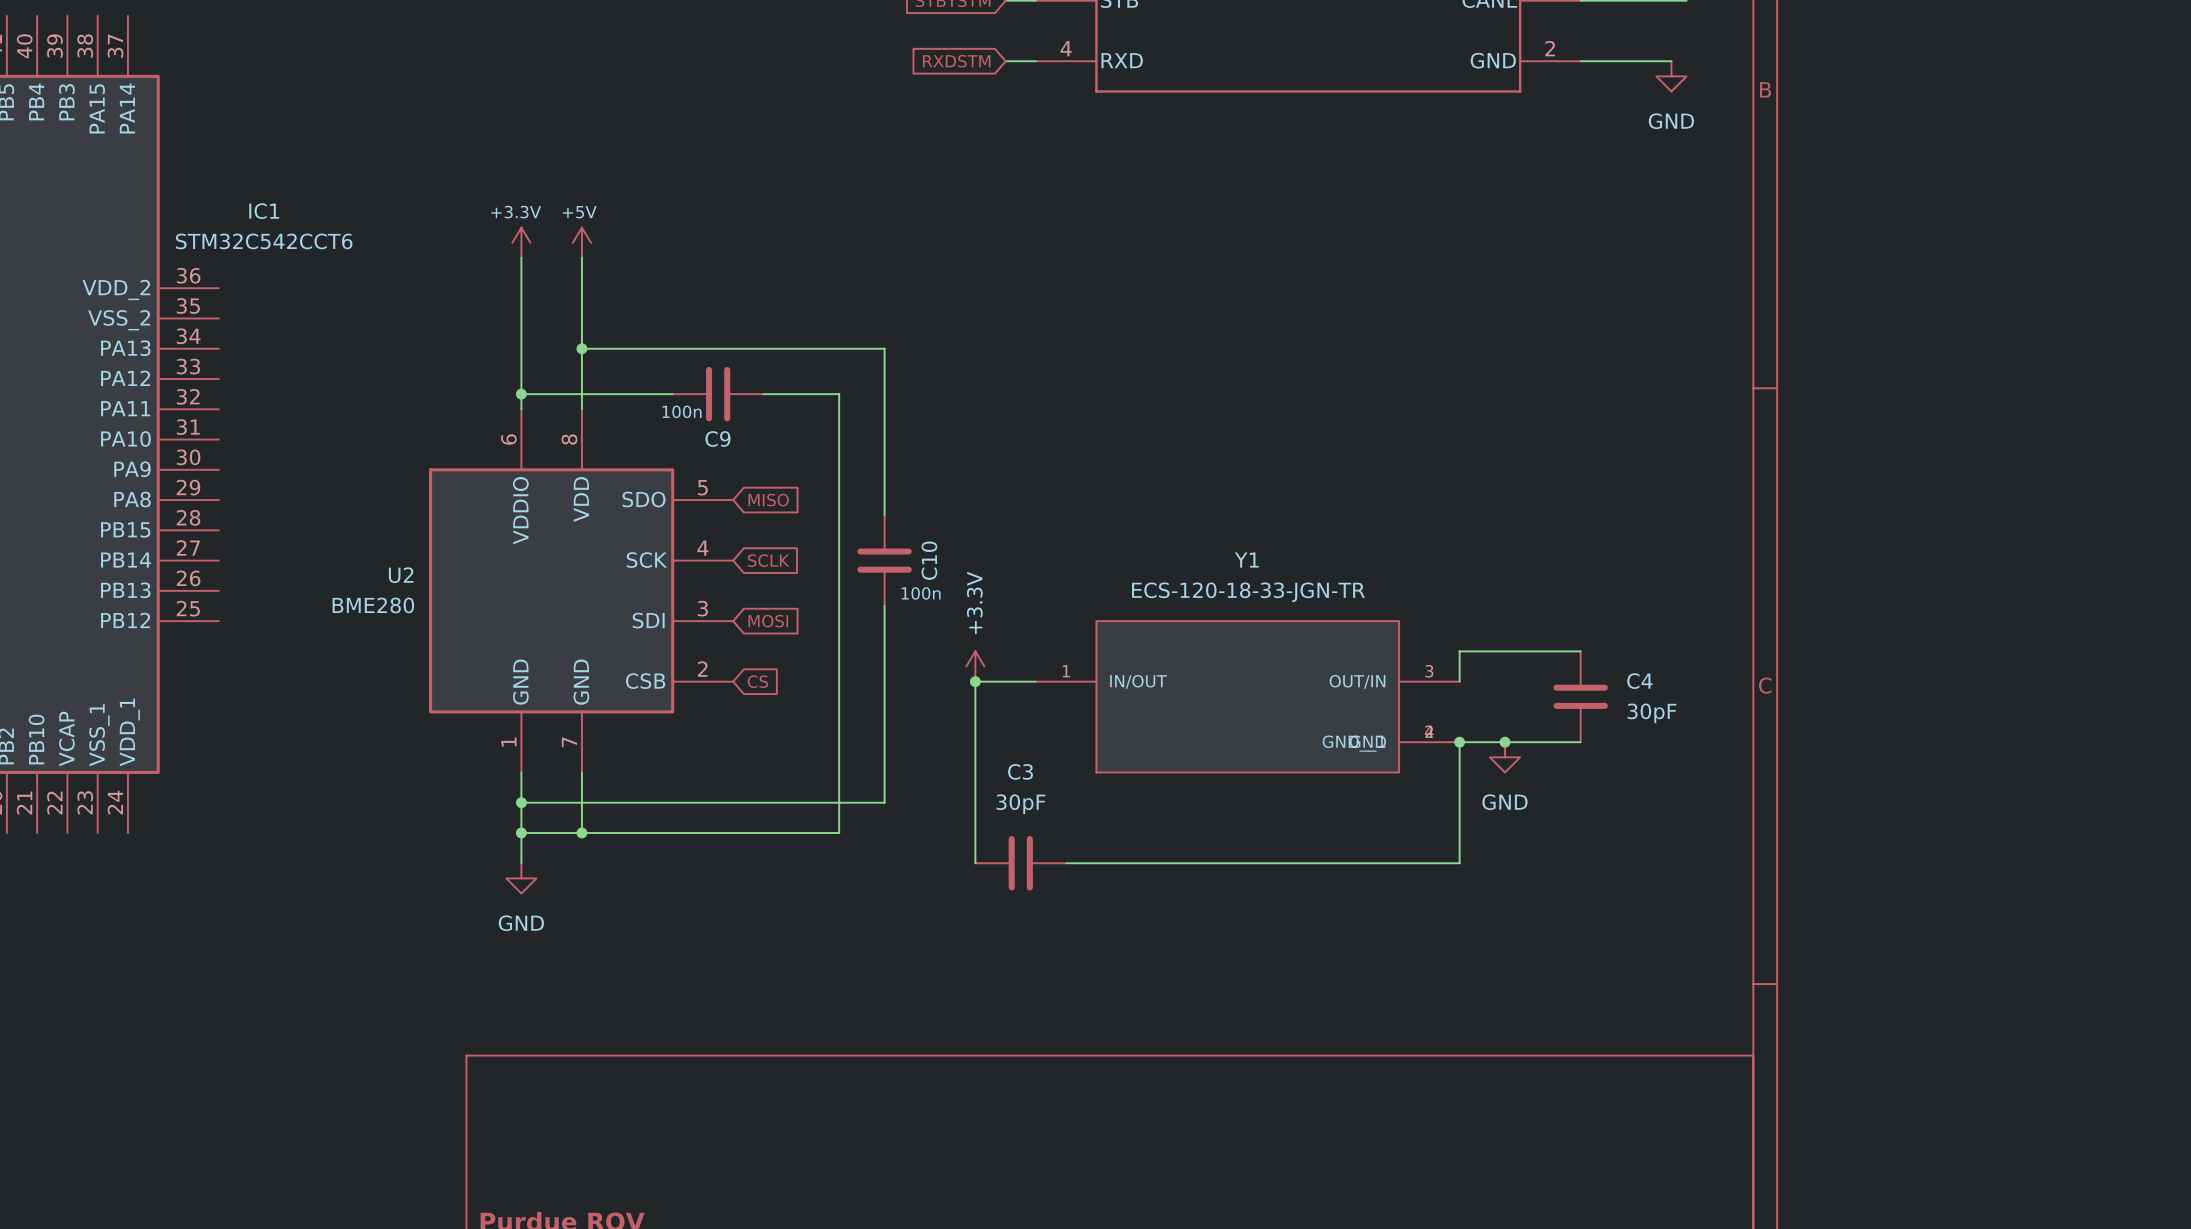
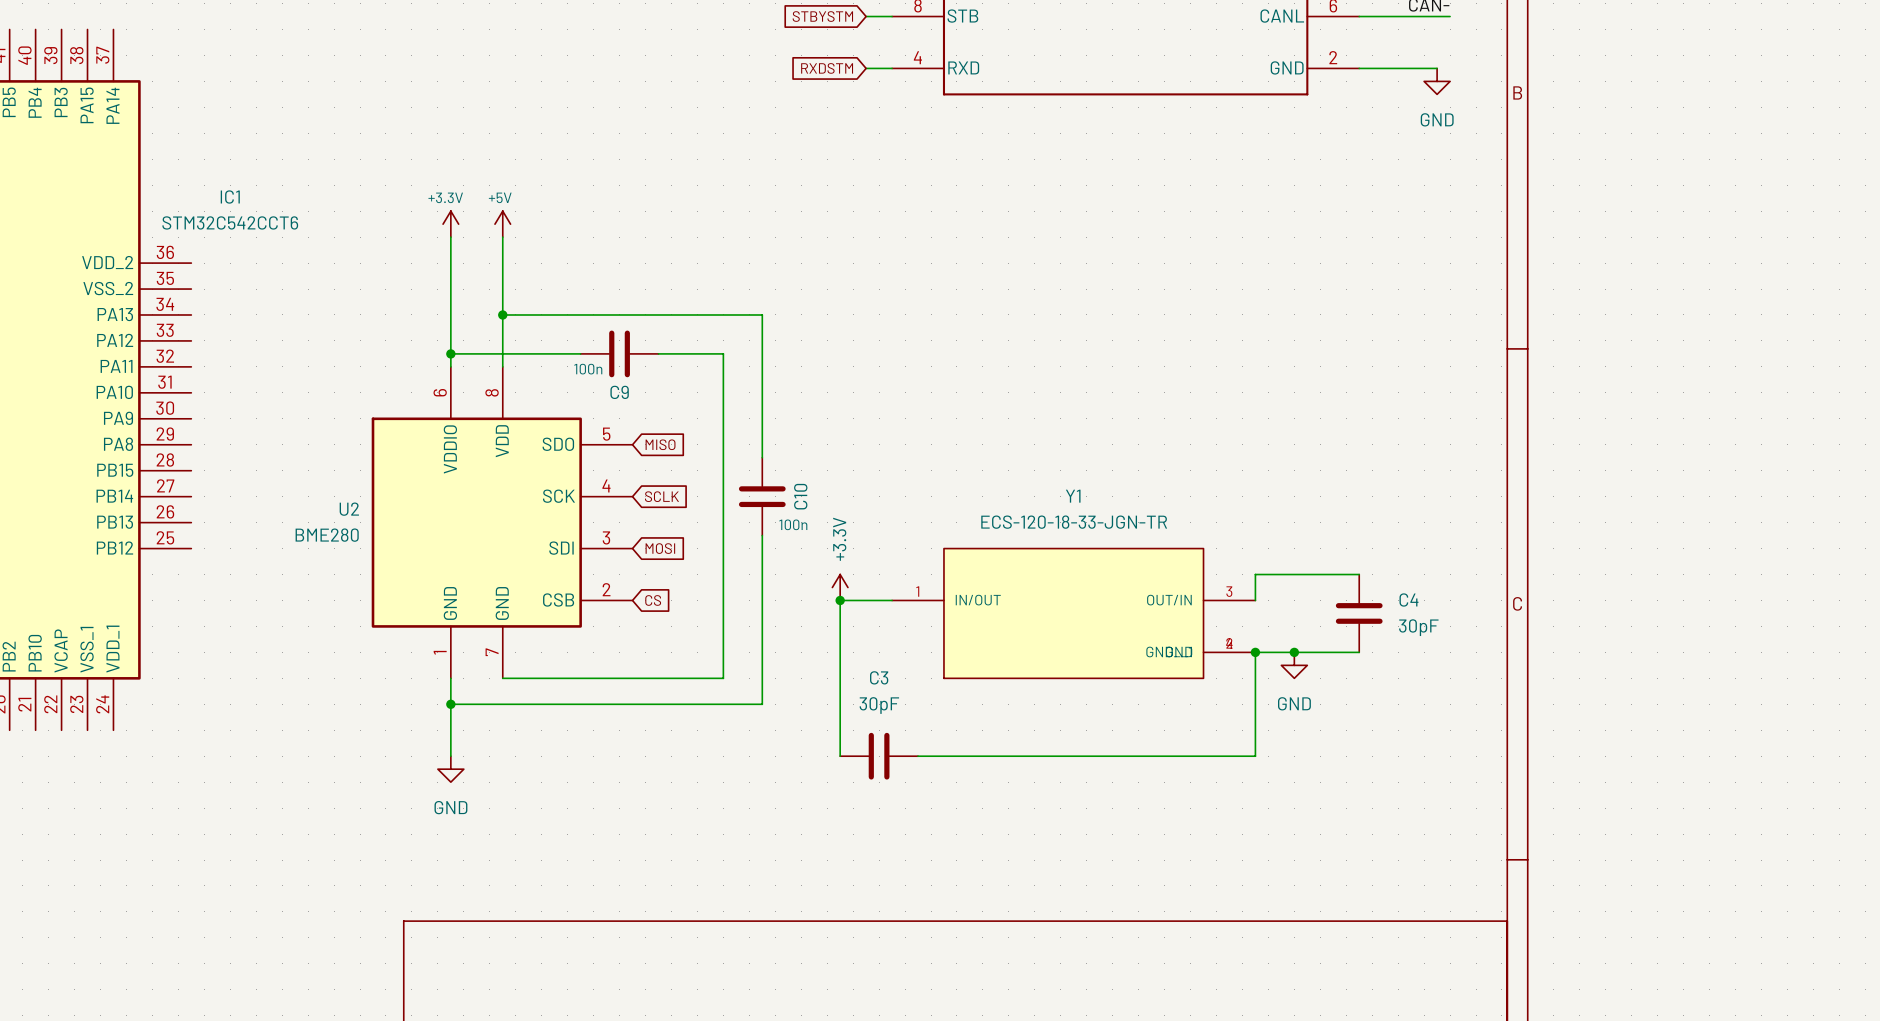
wire: (581, 772) (581, 832) -> none
wire: (839, 772) (839, 832) (521, 832) -> (723, 678) (502, 678)
junction: (521, 832) -> none
junction: (581, 832) -> none

